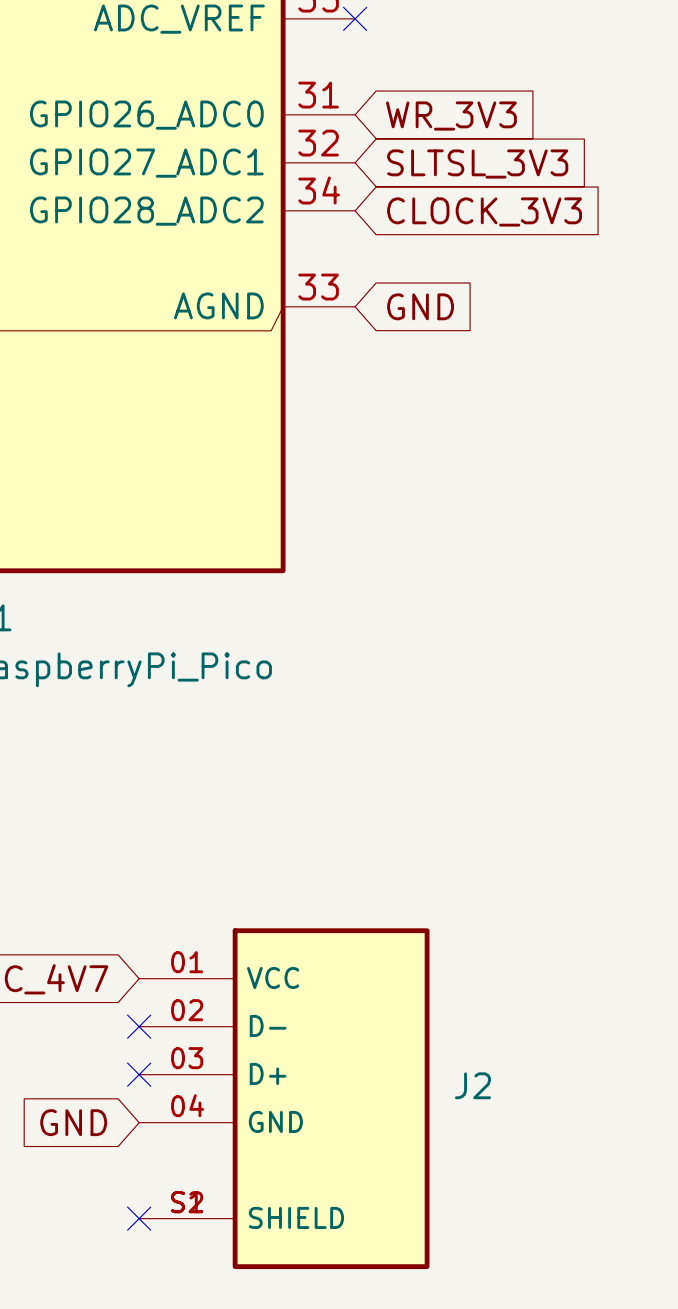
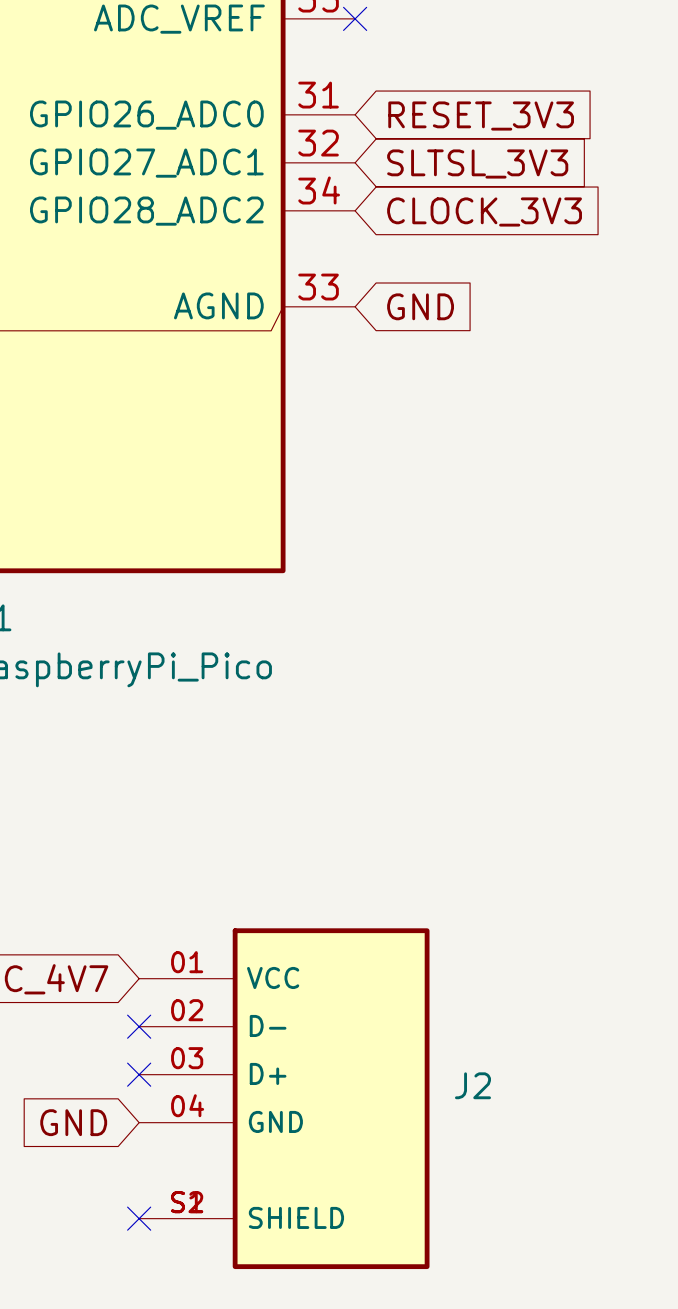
global label: WR_3V3 (451, 116) -> RESET_3V3 (481, 116)

